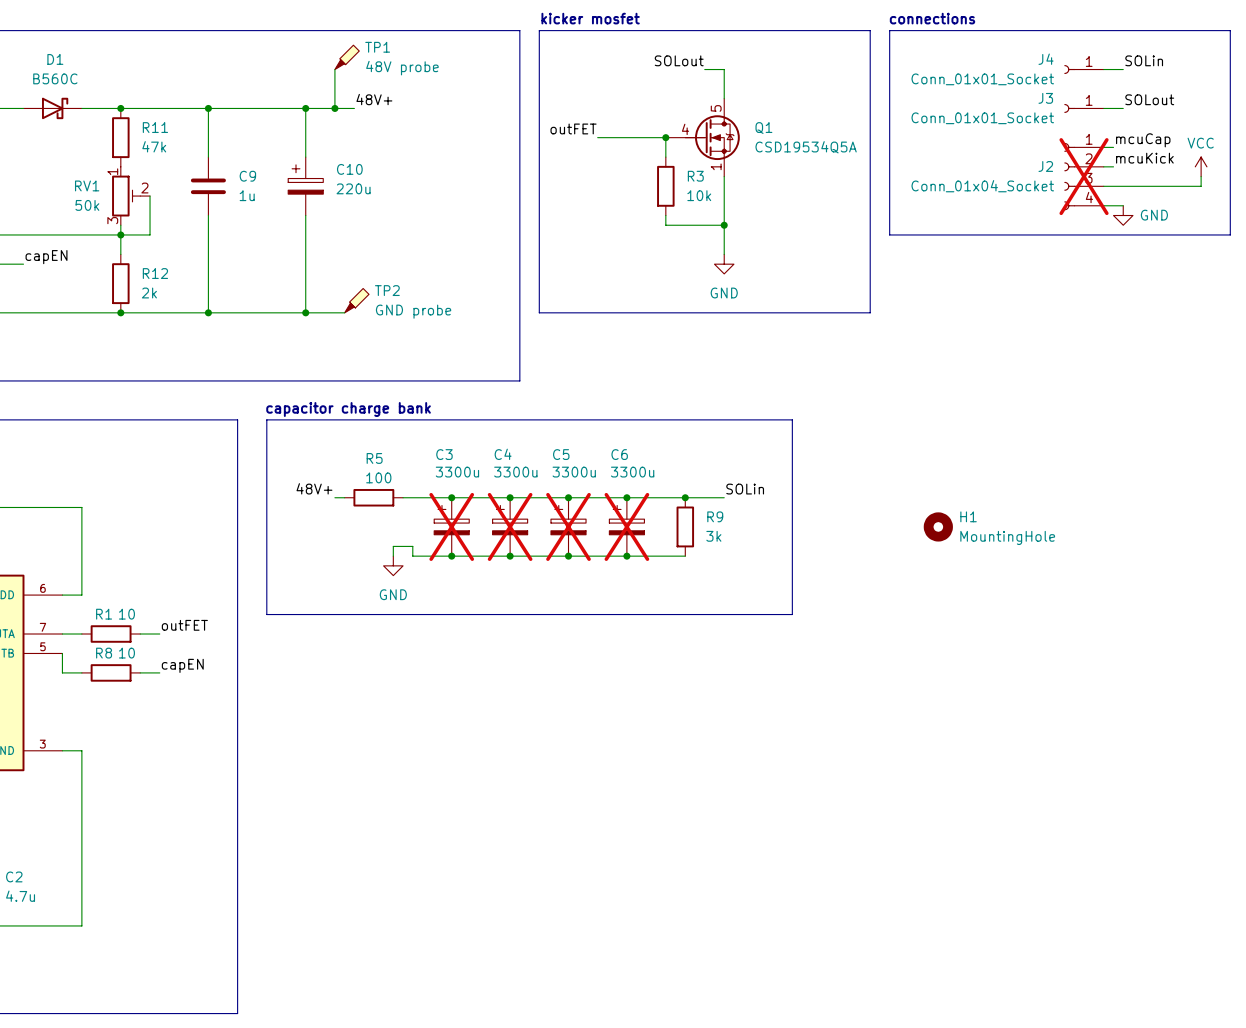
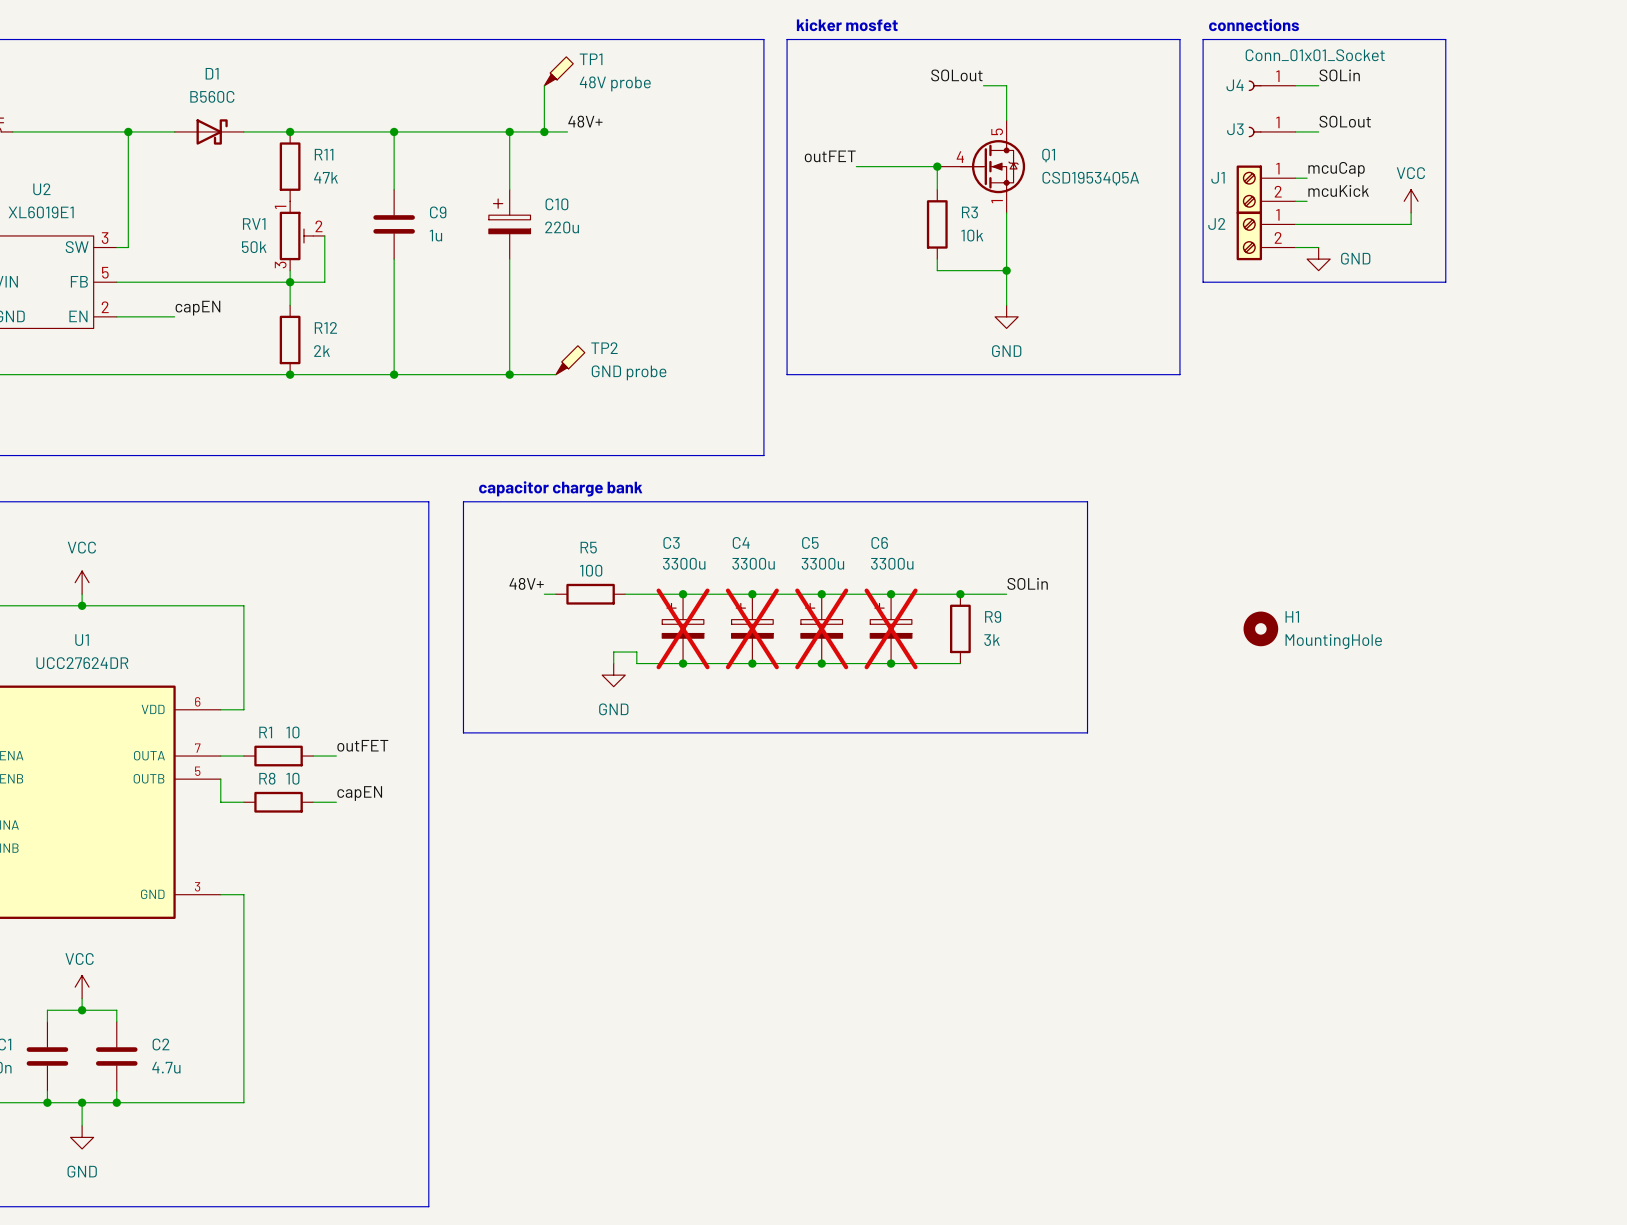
line: (1094, 30) (1230, 30) (1230, 234) (1094, 234) -> (1445, 39) (1445, 282)
J4 name position: J4 (1046, 59) -> J4 (1235, 85)
label position: SOLin (1144, 60) -> SOLin (1339, 75)
J4 position: (1084, 69) -> (1272, 85)
wire: (1103, 69) (1123, 69) -> (1295, 85) (1318, 85)
J4 value position: Conn_01x01_Socket (982, 79) -> Conn_01x01_Socket (1315, 55)
J3 name position: J3 (1045, 98) -> J3 (1235, 129)
label position: SOLout (1149, 99) -> SOLout (1345, 121)
J3 position: (1084, 108) -> (1272, 131)
wire: (1103, 108) (1123, 108) -> (1295, 131) (1318, 131)
J3 value: Conn_01x01_Socket (982, 118) -> none
label position: mcuCap (1143, 140) -> mcuCap (1336, 169)
J2 symbol: [1064, 142, 1104, 211] -> [1236, 211, 1296, 261]
wire: (1103, 147) (1113, 147) -> (1295, 178) (1307, 178)
J1: none -> (1266, 189)
label position: mcuKick (1144, 158) -> mcuKick (1338, 190)
wire: (1103, 166) (1113, 166) -> (1295, 201) (1307, 201)
power symbol position: VCC (1201, 166) -> VCC (1411, 201)
J2 do-not-place cross: (1084, 176) -> none
wire: (1201, 176) (1201, 186) (1103, 186) -> (1411, 212) (1411, 224) (1295, 224)
J2 value: Conn_01x04_Socket (982, 186) -> none
wire: (1103, 205) (1123, 205) -> (1295, 247) (1318, 247)
power symbol position: GND (1123, 215) -> GND (1318, 259)

